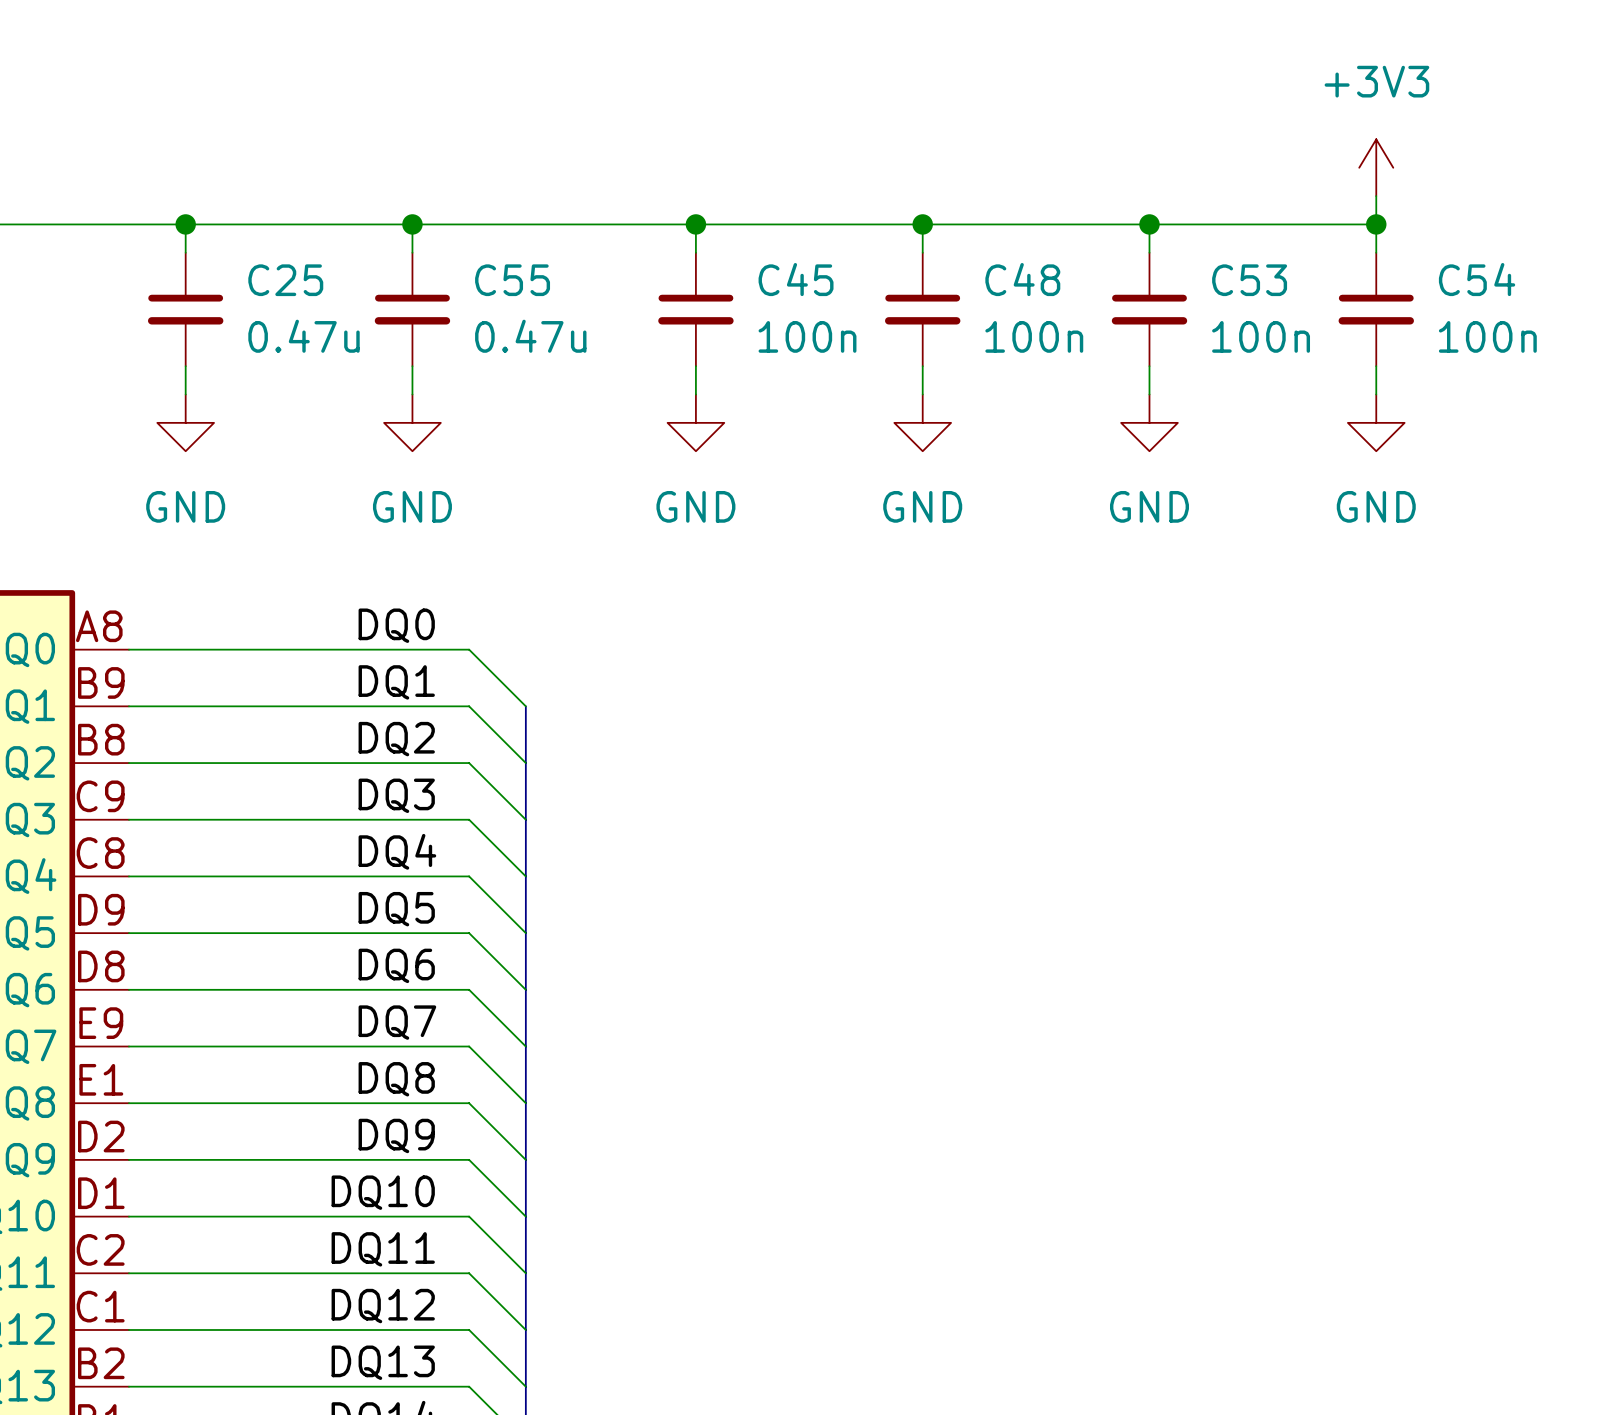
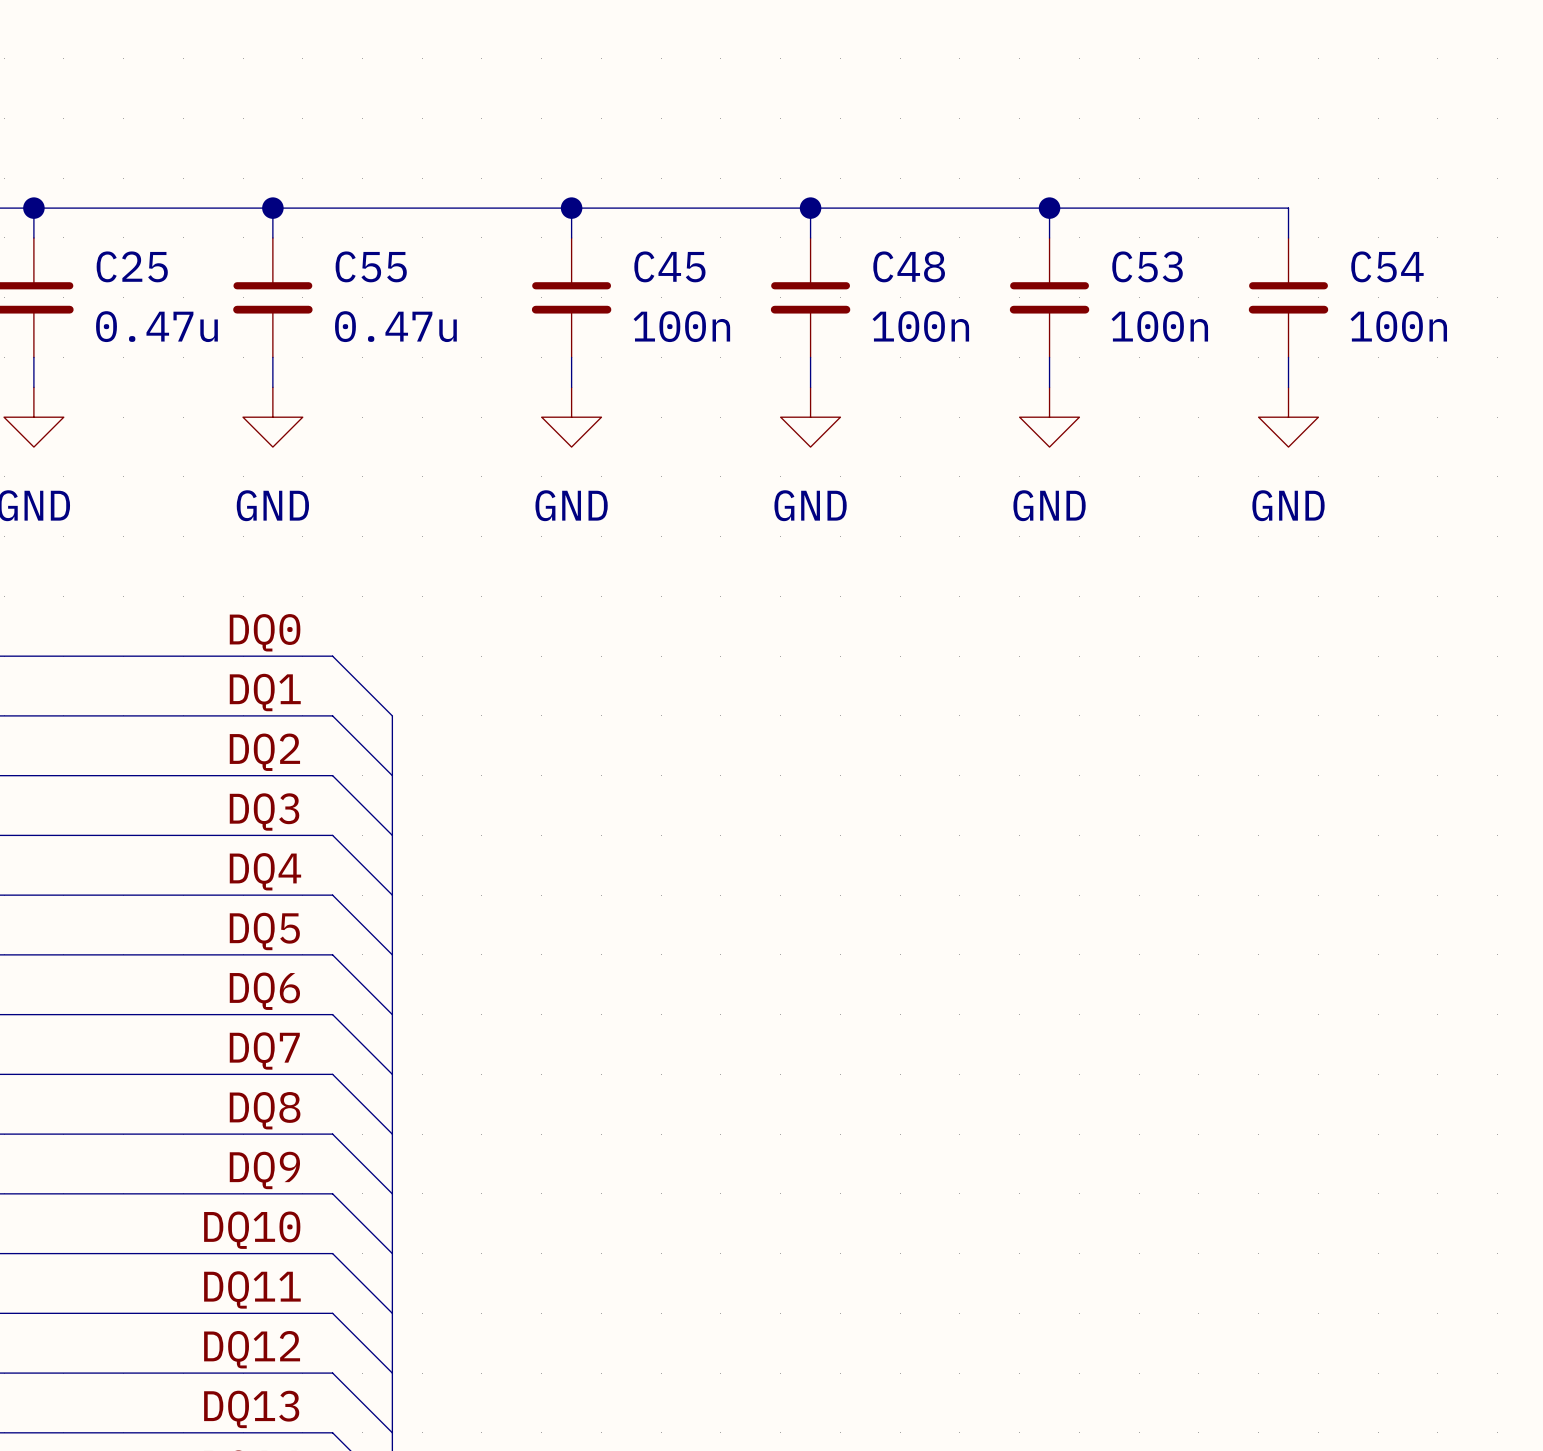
power symbol: +3V3 (1376, 167) -> none
wire: (1376, 196) (1376, 224) -> none
junction: (1376, 224) -> none

